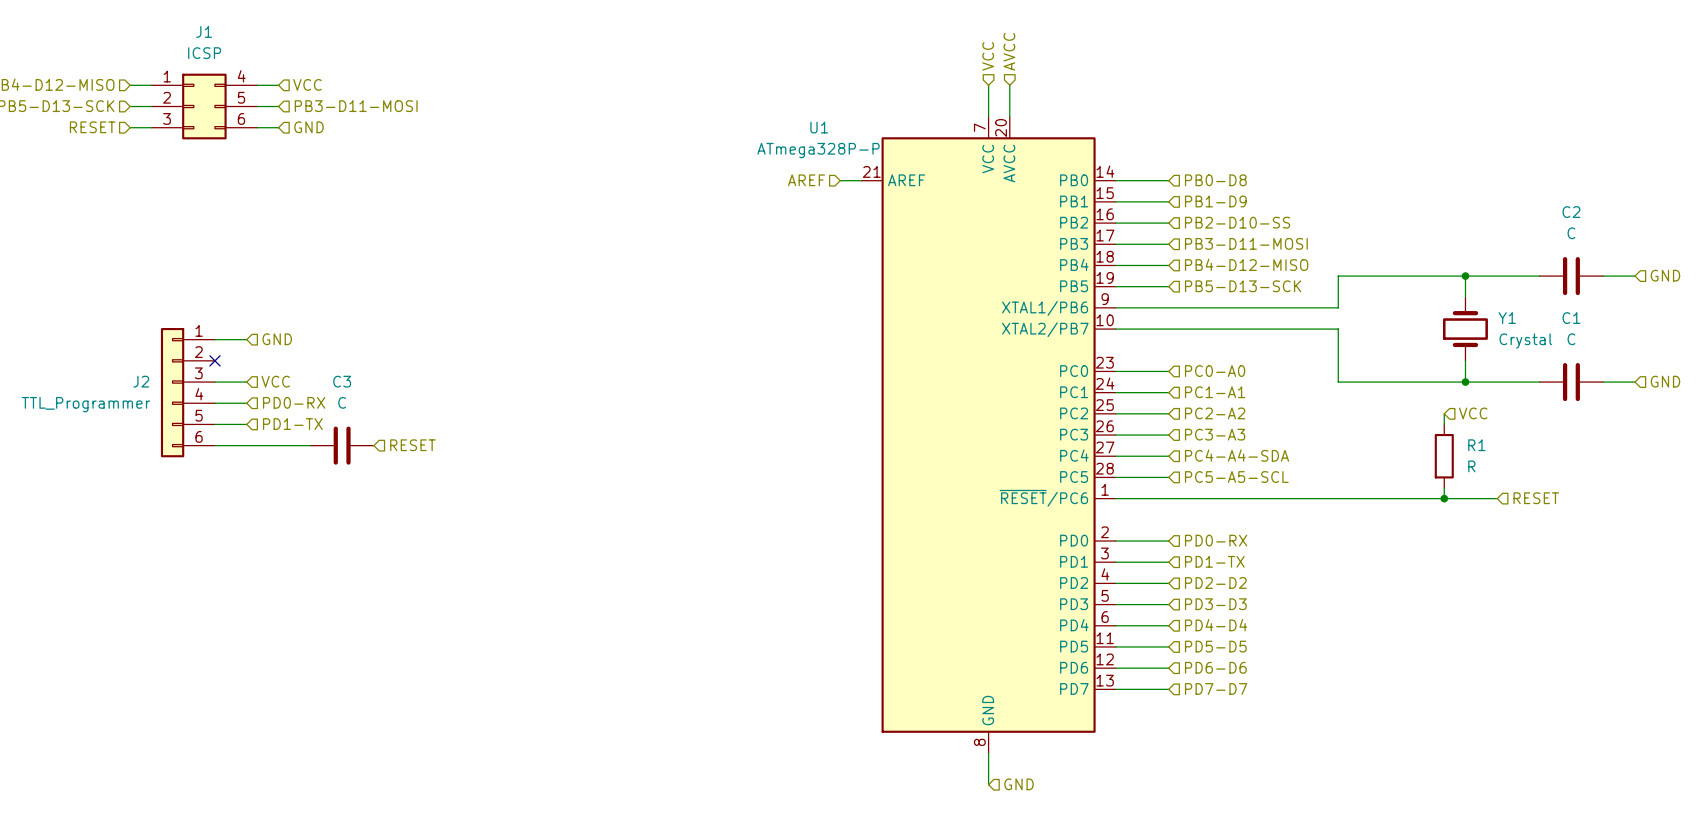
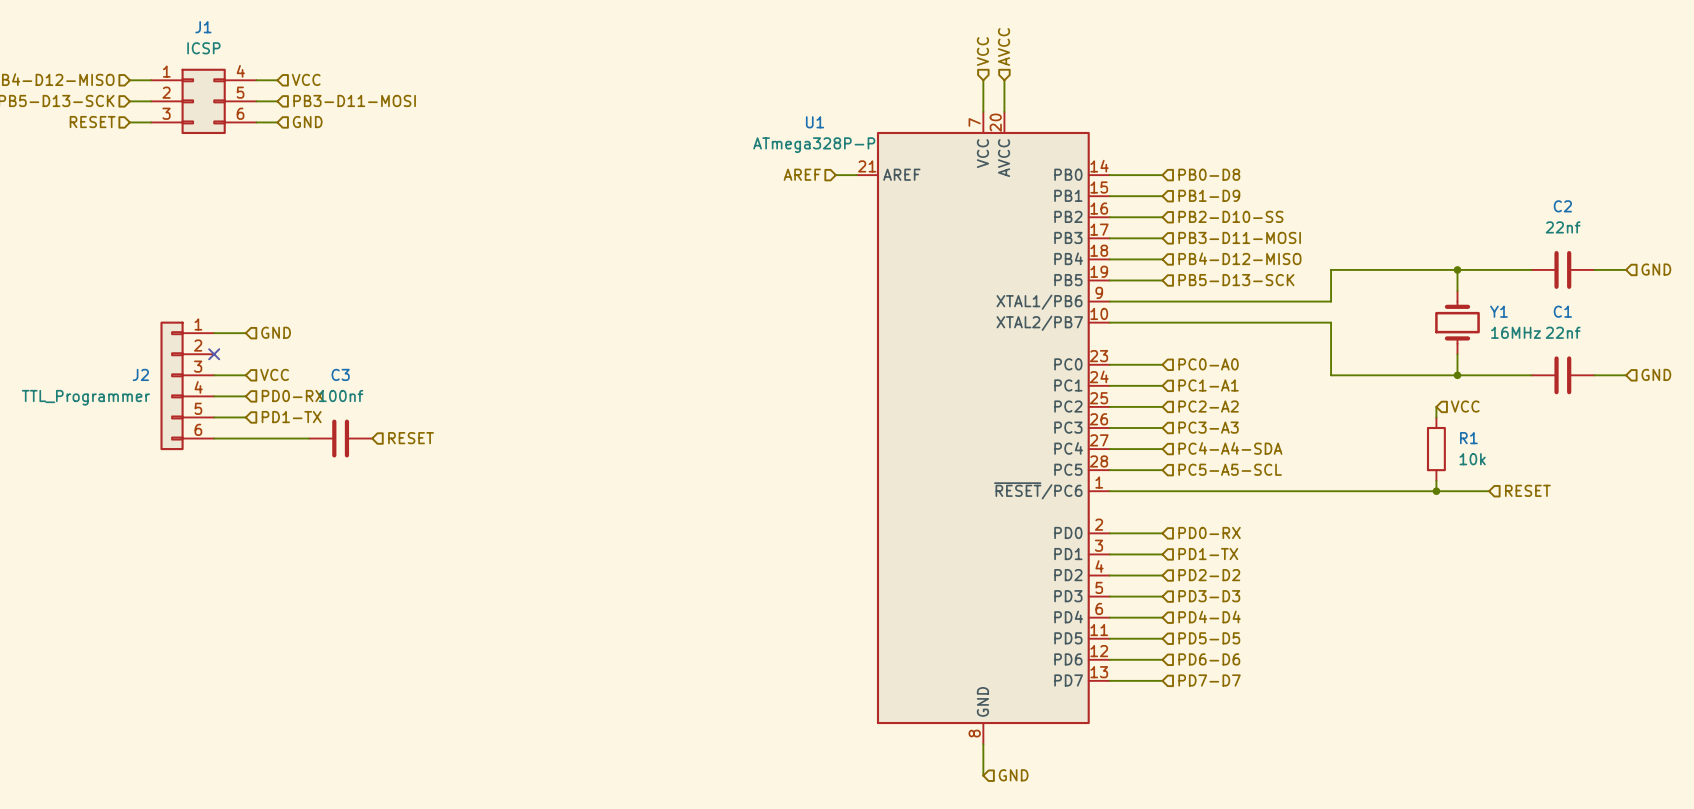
C2 value: C (1571, 233) -> 22nf (1563, 227)
C1 value: C (1571, 339) -> 22nf (1563, 332)
Y1 value: Crystal (1525, 341) -> 16MHz (1516, 332)
C3 value: C (342, 402) -> 100nf (341, 395)
R1 value: R (1471, 466) -> 10k (1472, 459)

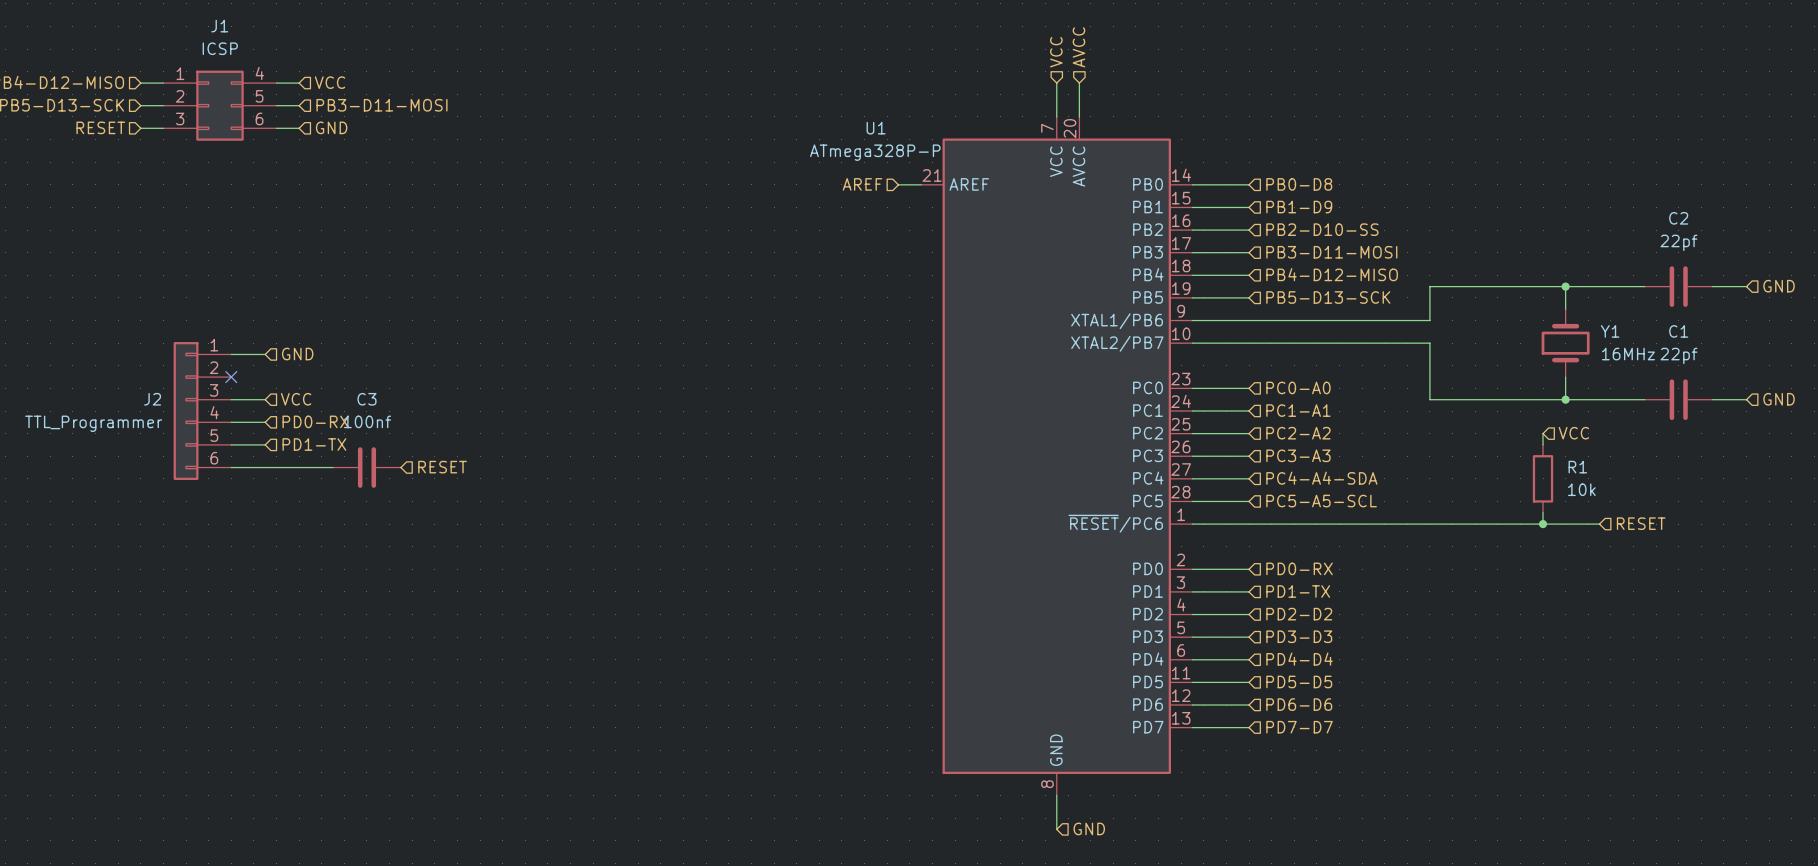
C2 value: 22nf (1563, 227) -> 22pf (1678, 242)
C1 value: 22nf (1563, 332) -> 22pf (1678, 355)

